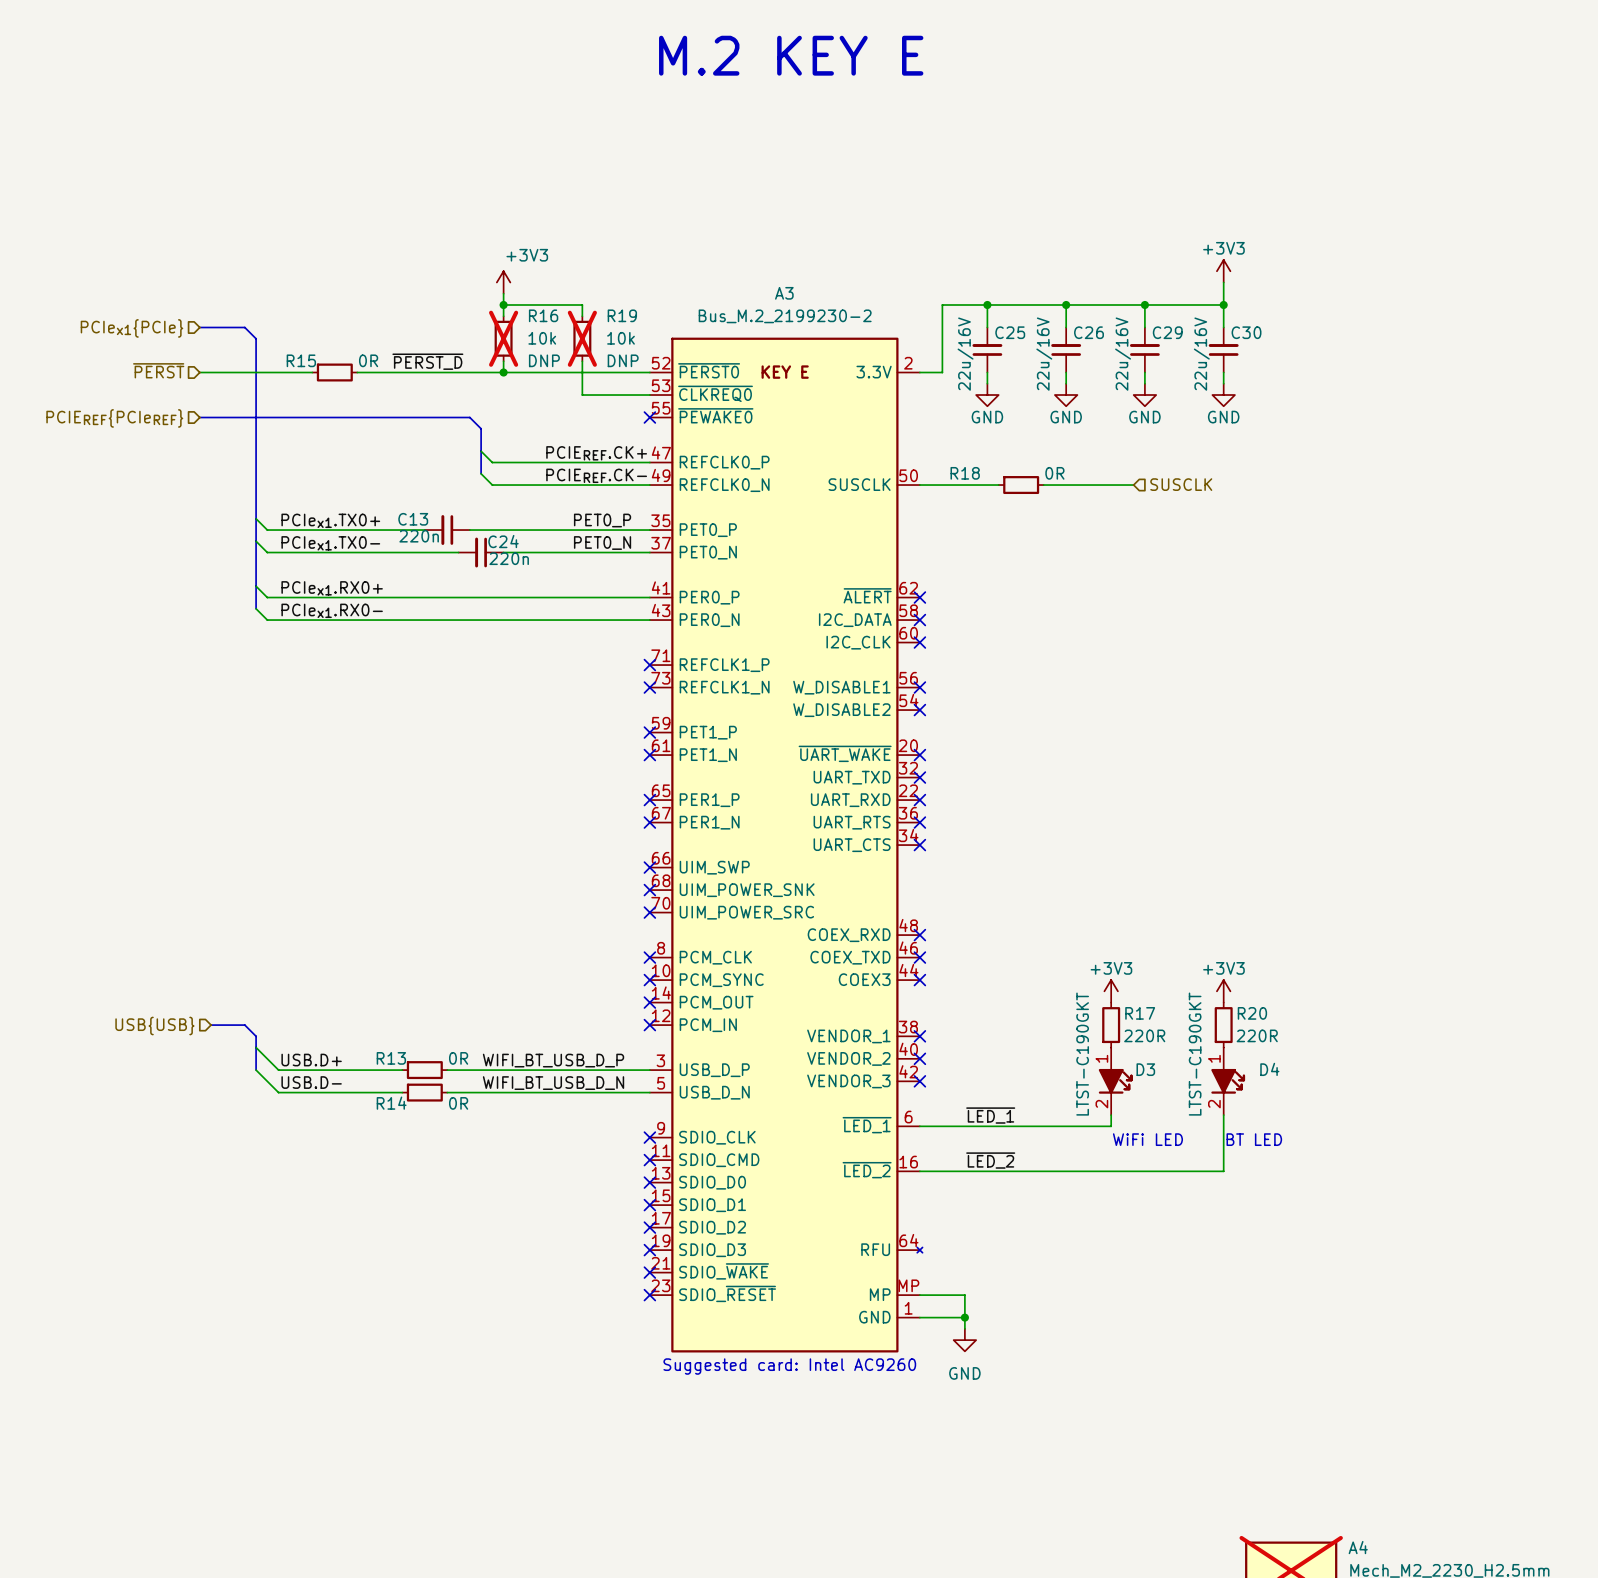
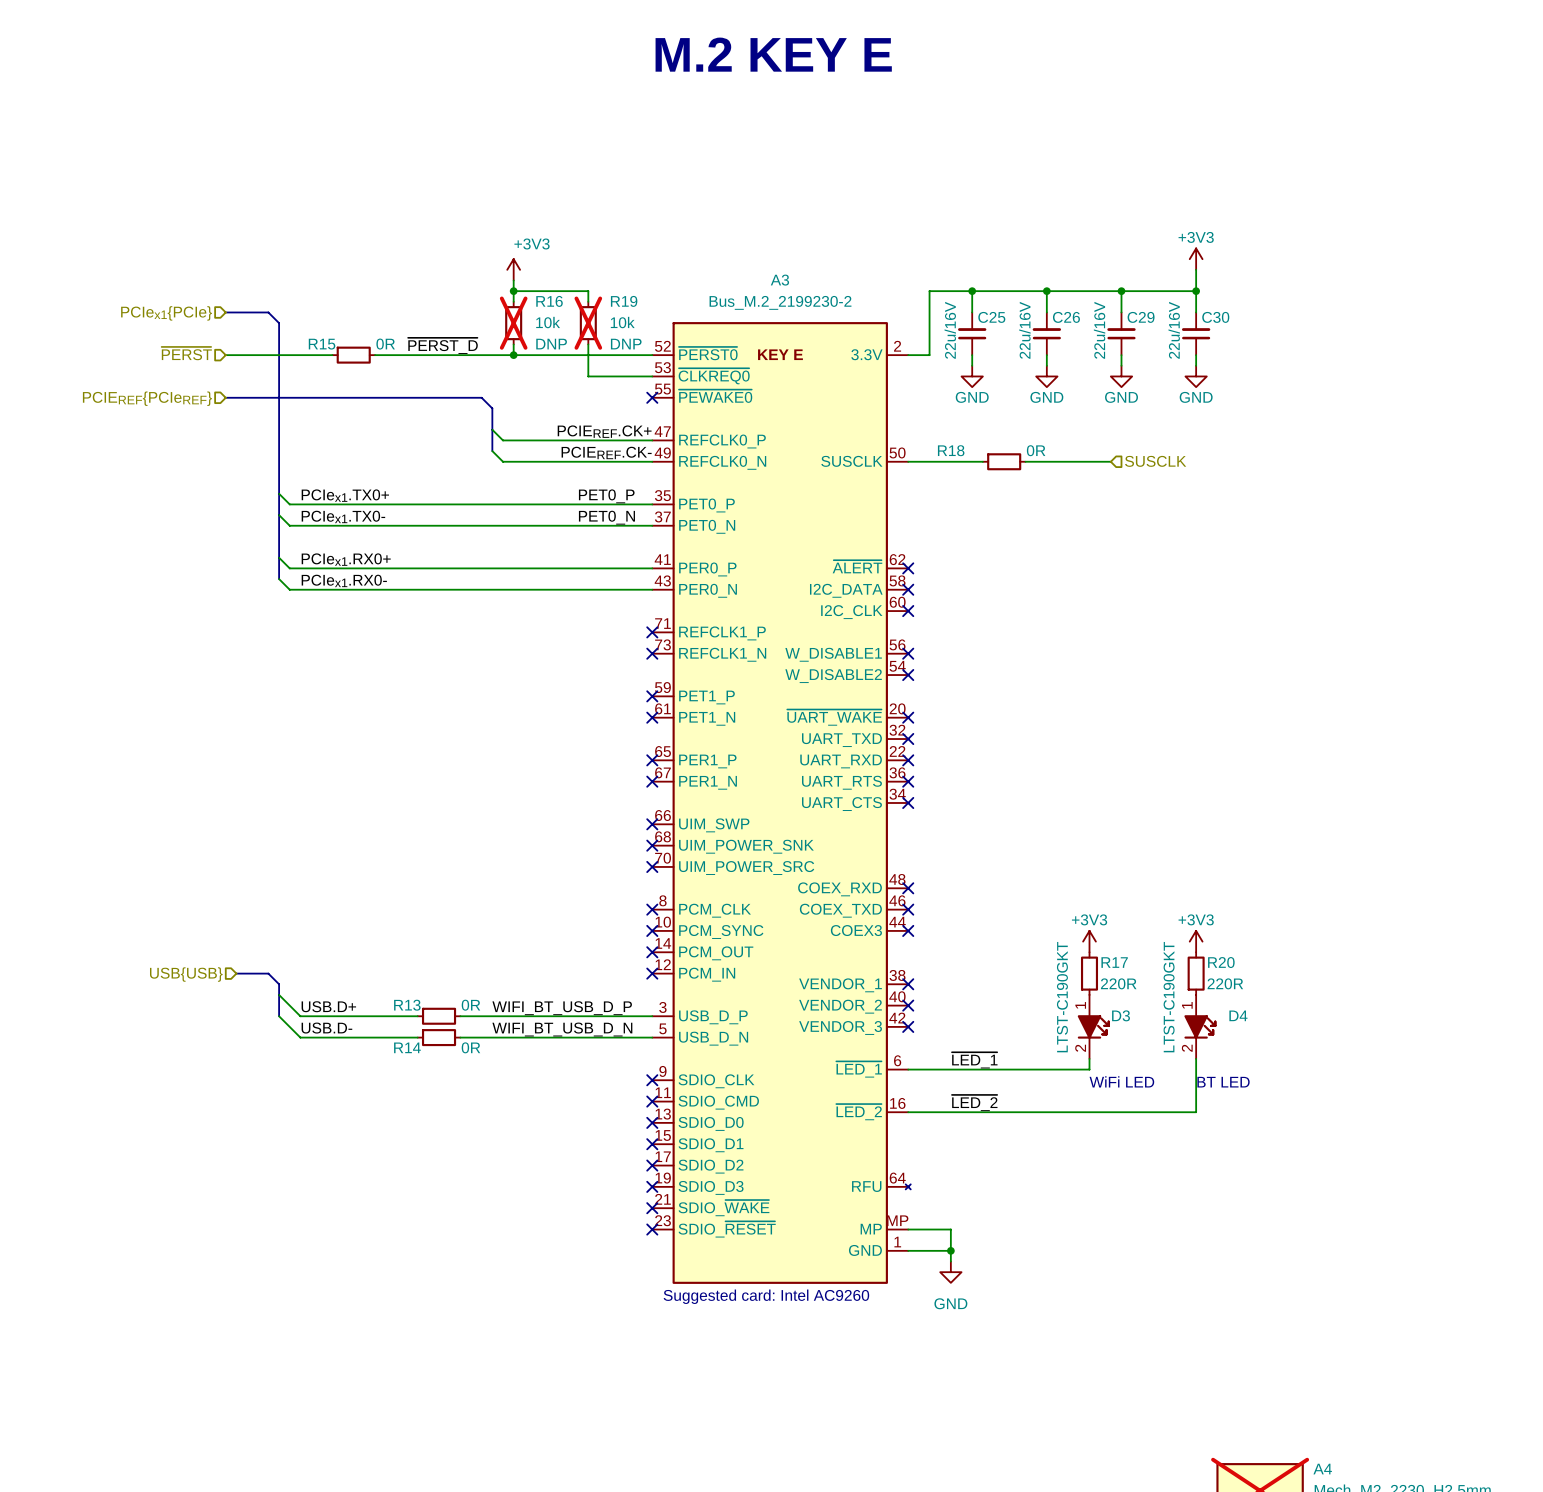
C13: (447, 530) -> none
C24: (481, 552) -> none

